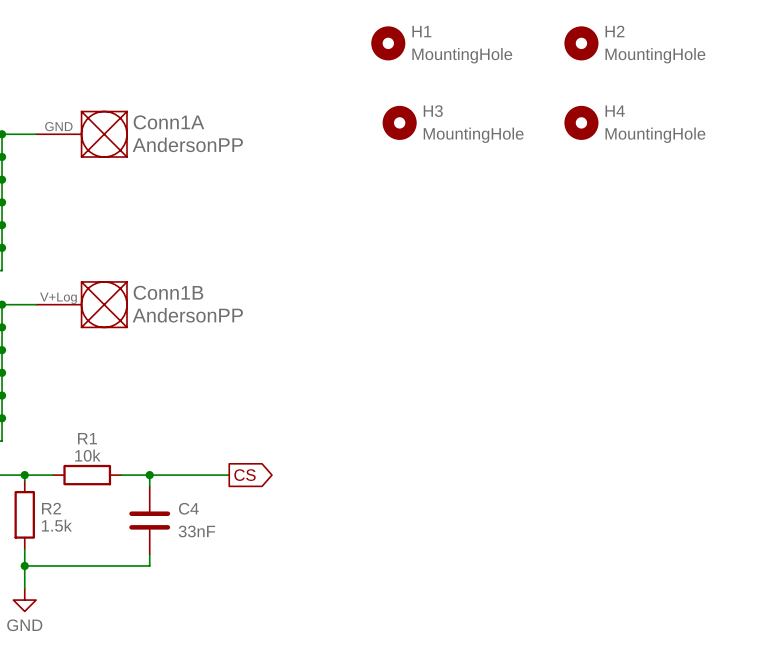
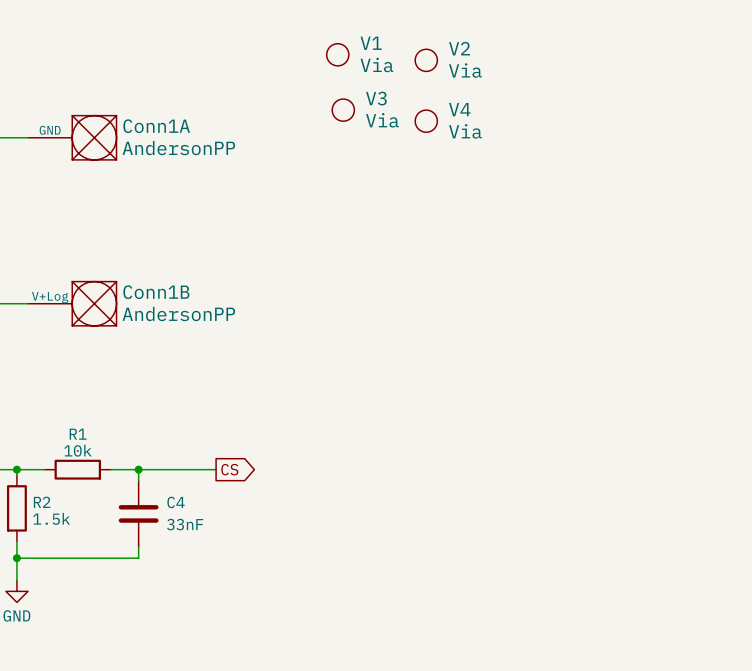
H1: MountingHole (388, 43) -> none
H2: MountingHole (581, 43) -> none
V1: none -> Via (337, 54)
V2: none -> Via (426, 60)
V3: none -> Via (343, 110)
V4: none -> Via (426, 121)
H3: MountingHole (399, 122) -> none
H4: MountingHole (581, 122) -> none

